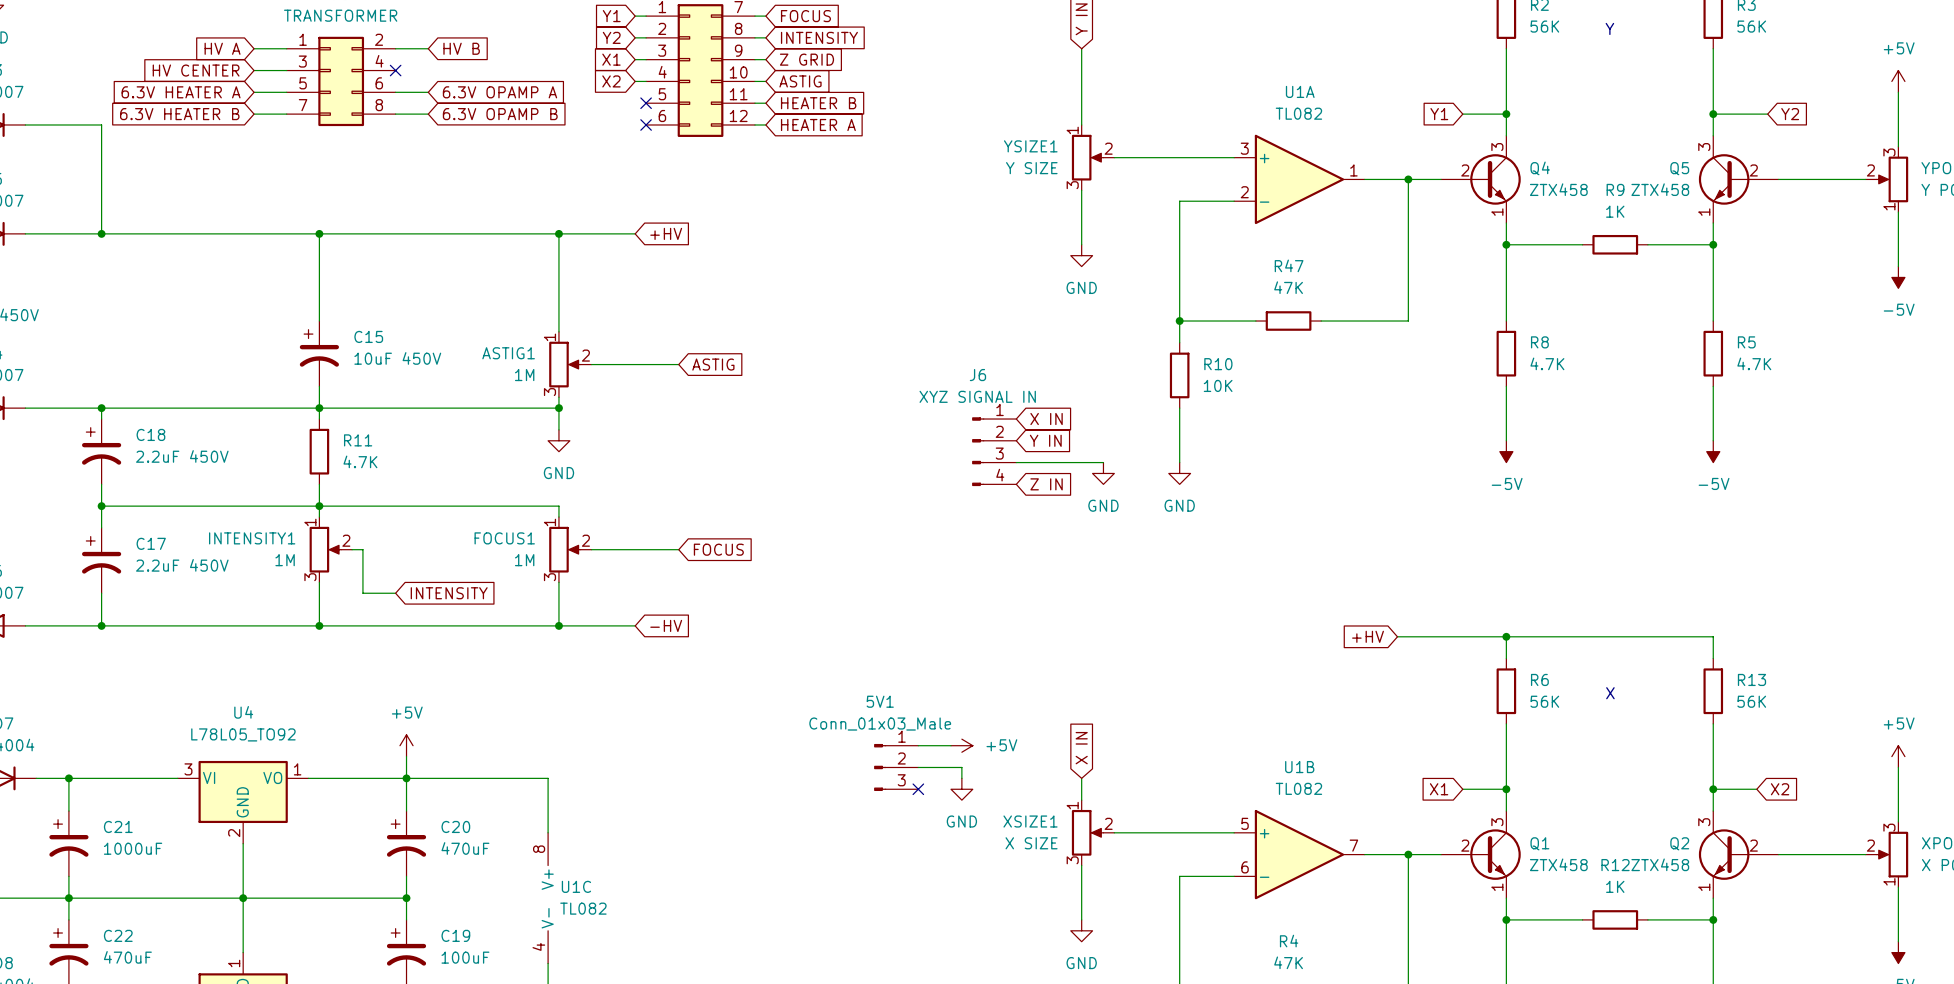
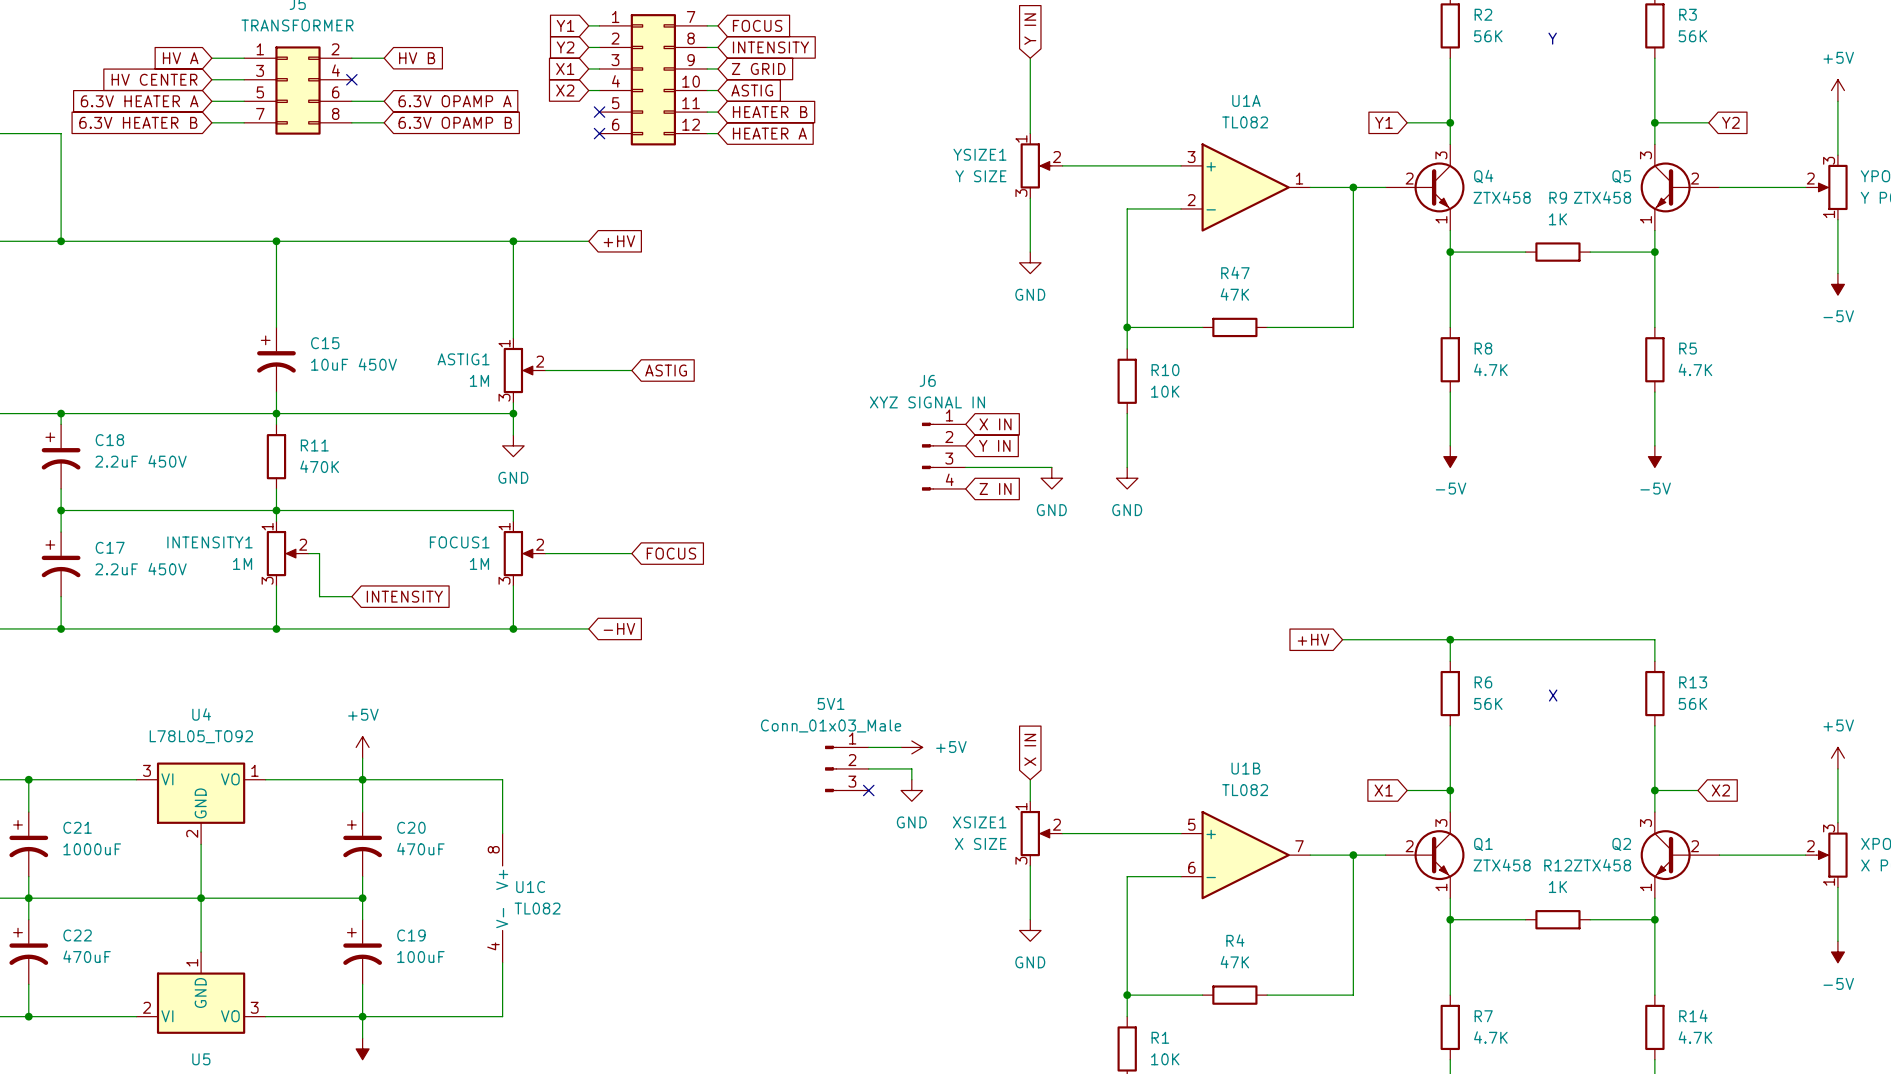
R11 value: 4.7K (360, 461) -> 470K (319, 466)

